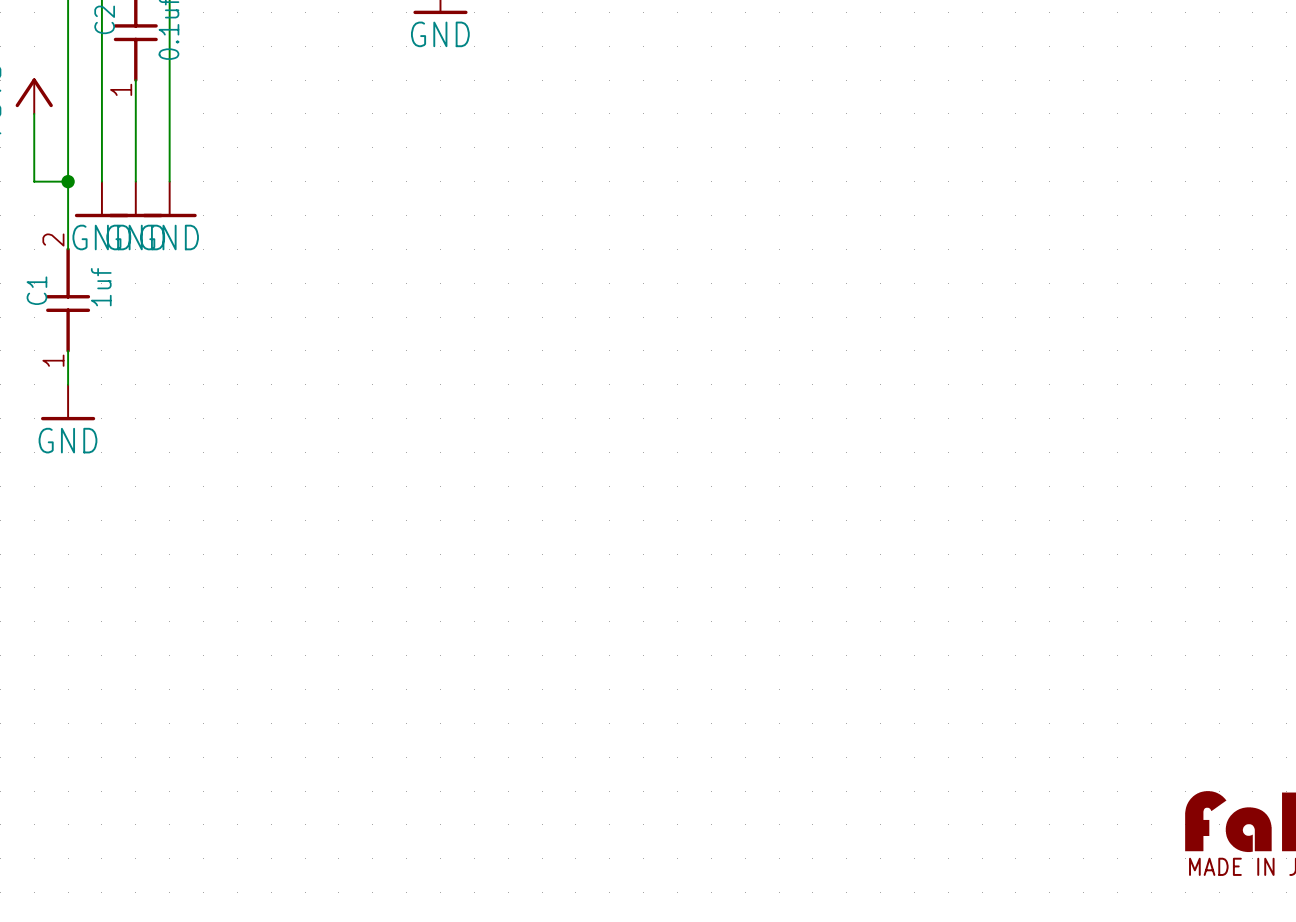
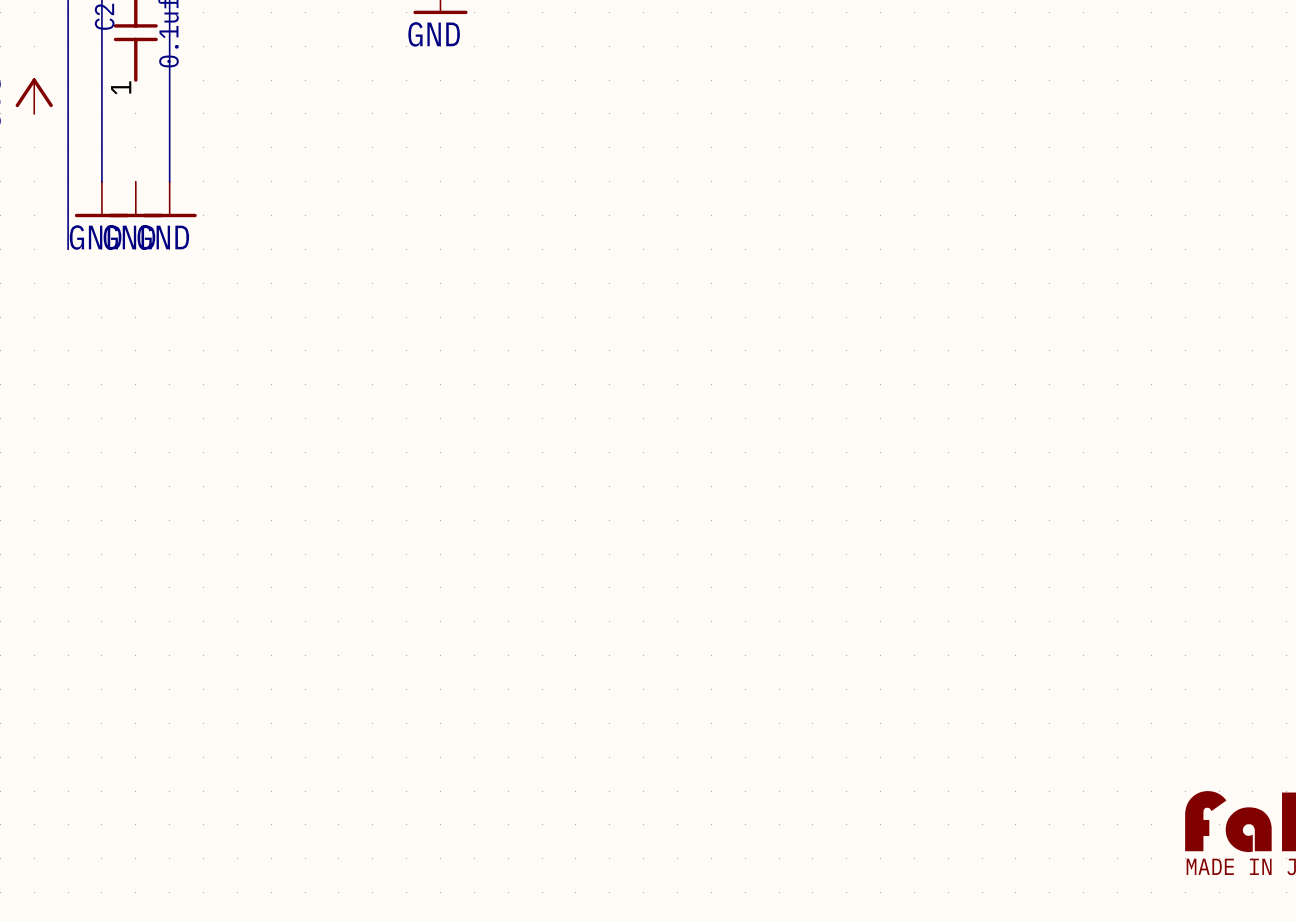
wire: (135, 80) (135, 181) -> none
wire: (34, 113) (34, 181) (68, 181) -> none
junction: (68, 181) -> none
C1: 1uf (68, 300) -> none
wire: (68, 350) (68, 384) -> none
power symbol: GND (68, 402) -> none

